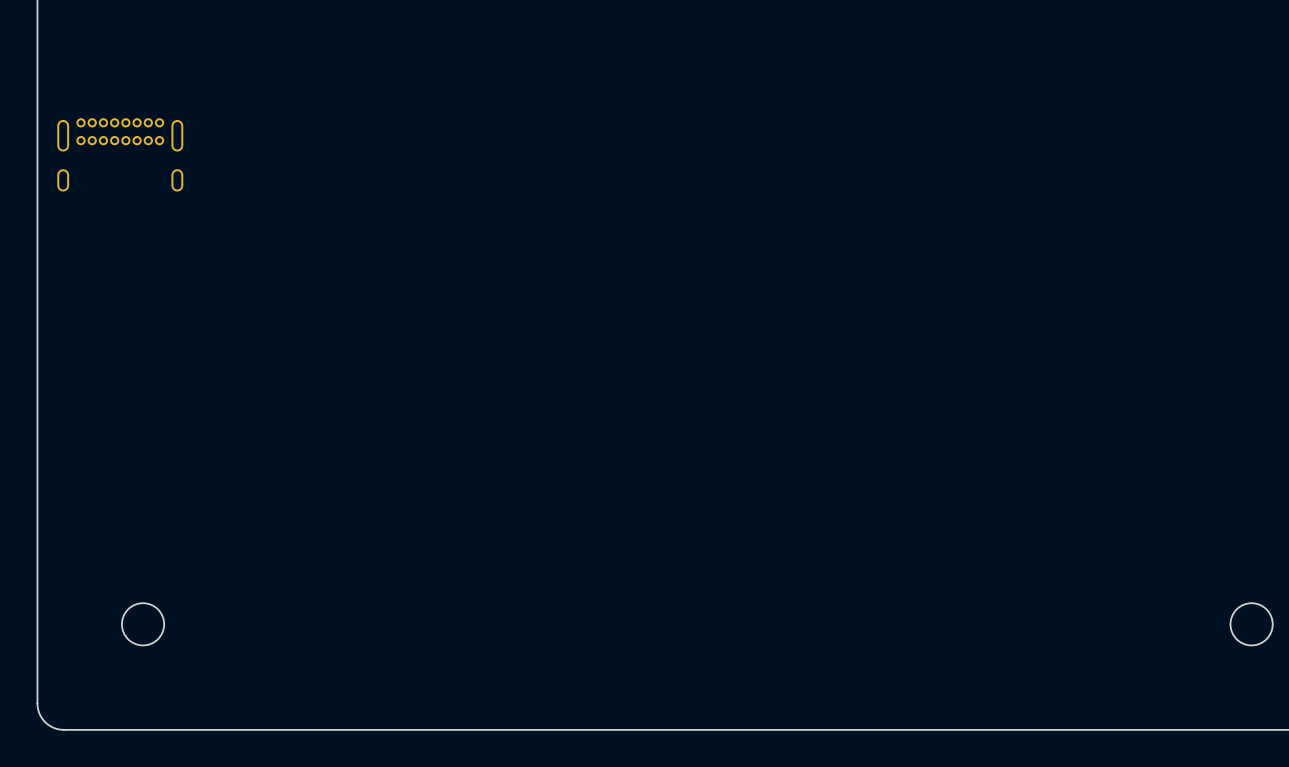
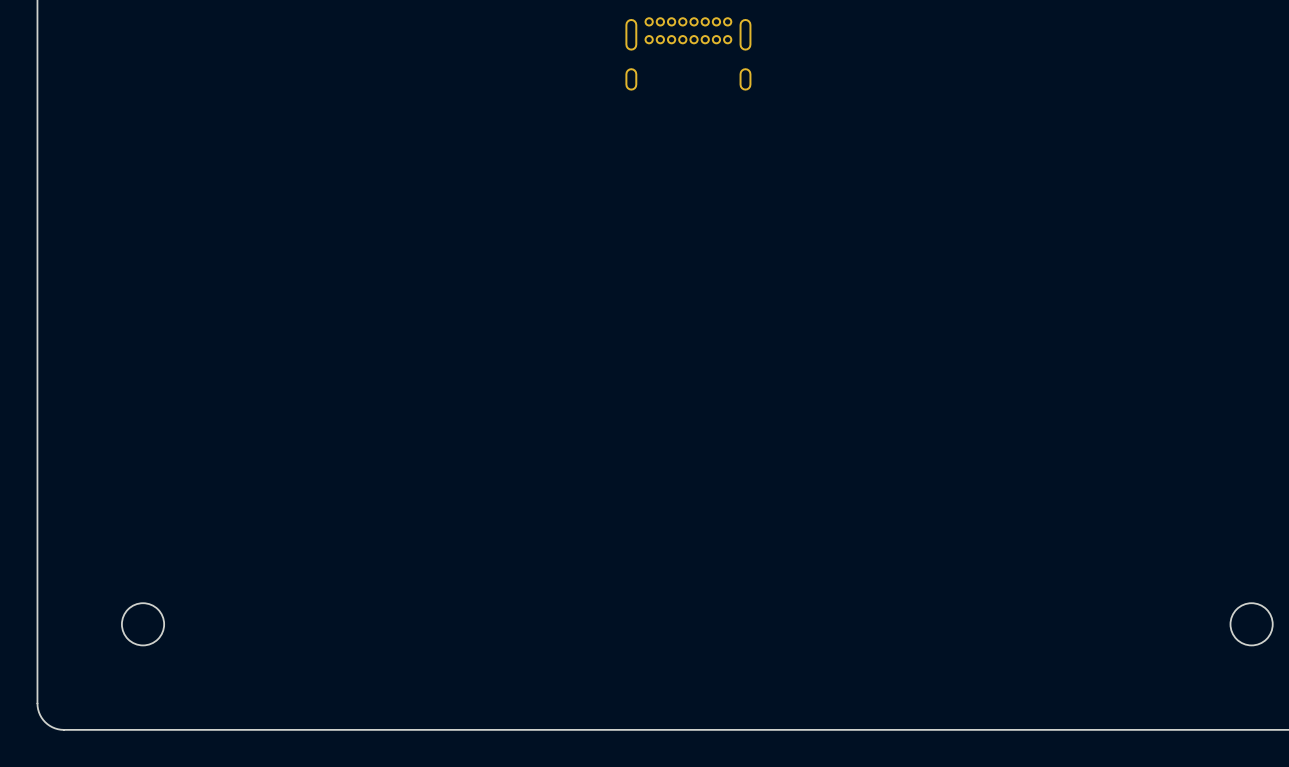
part: none -> (688, 53)
part: (120, 154) -> none

